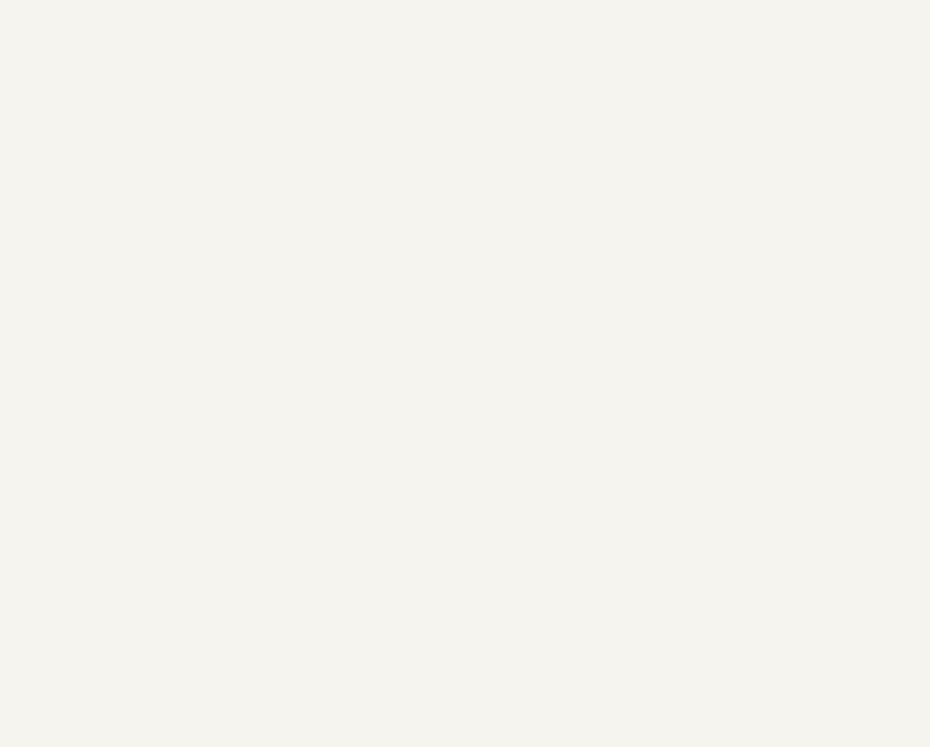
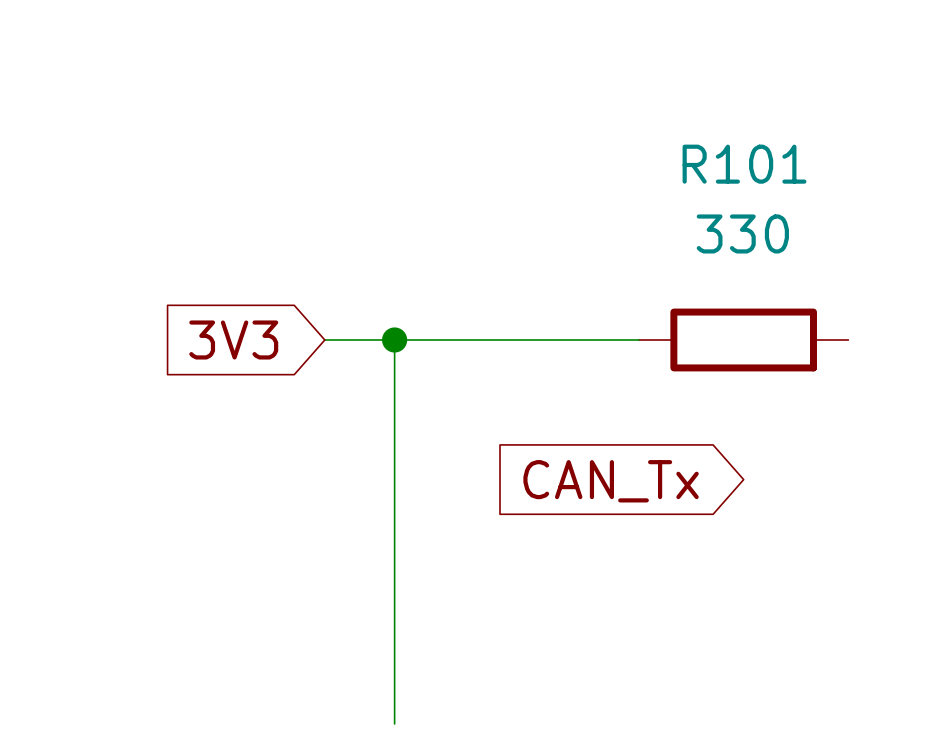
global label: none -> 3V3 (233, 339)
wire: none -> (324, 339) (638, 339)
wire: none -> (394, 339) (394, 723)
junction: none -> (394, 339)
R101: none -> 330 (743, 339)
global label: none -> CAN_Tx (611, 481)

